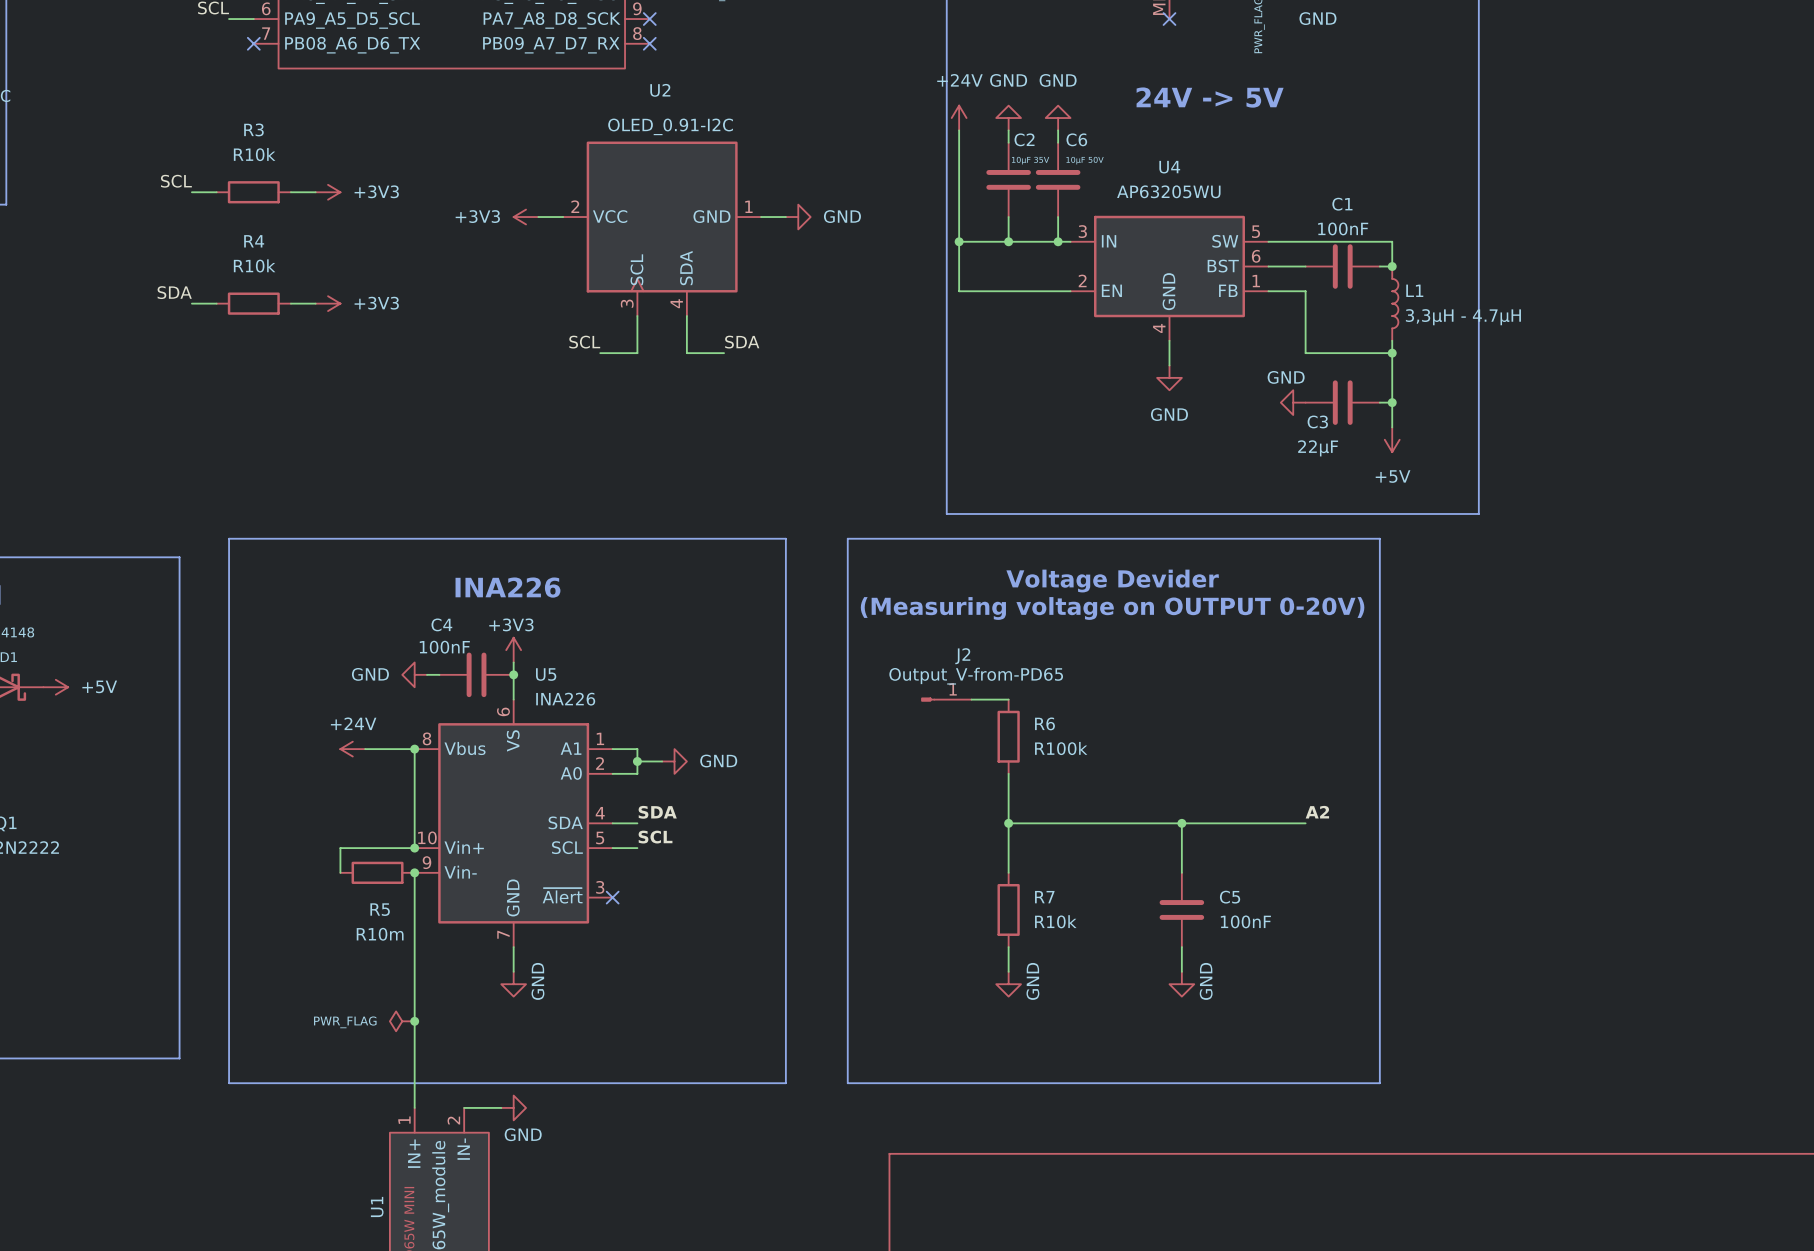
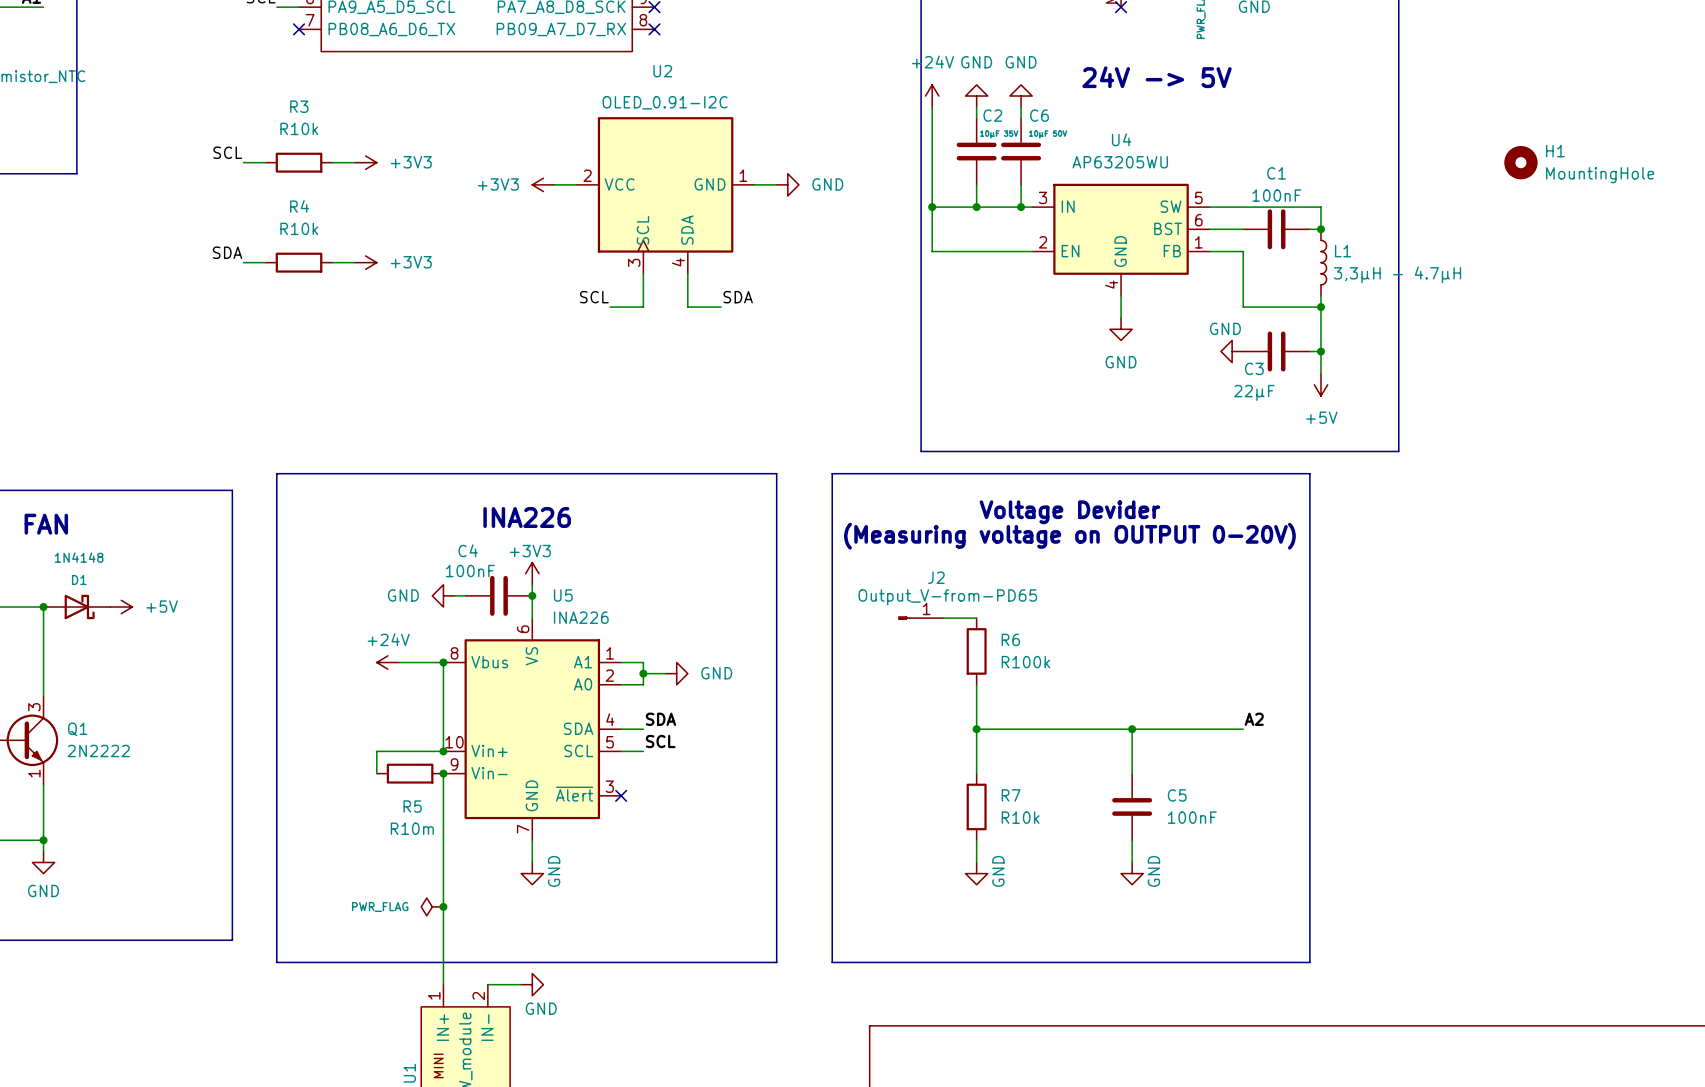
H1: none -> MountingHole (1520, 162)

